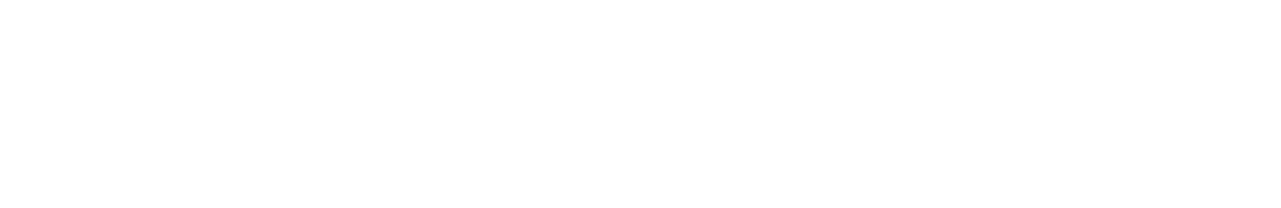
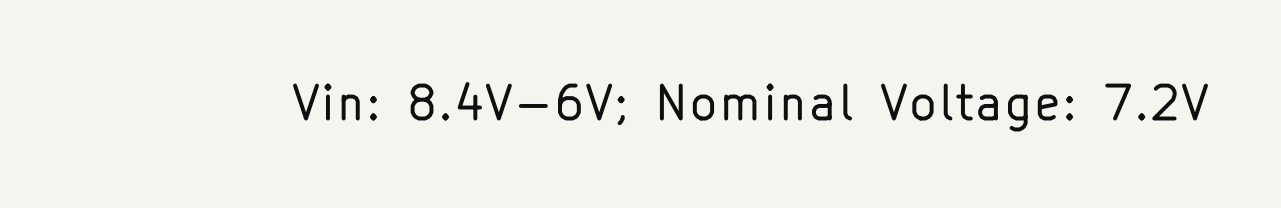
label: none -> Vin: 8.4V-6V; Nominal Voltage: 7.2V (750, 106)

